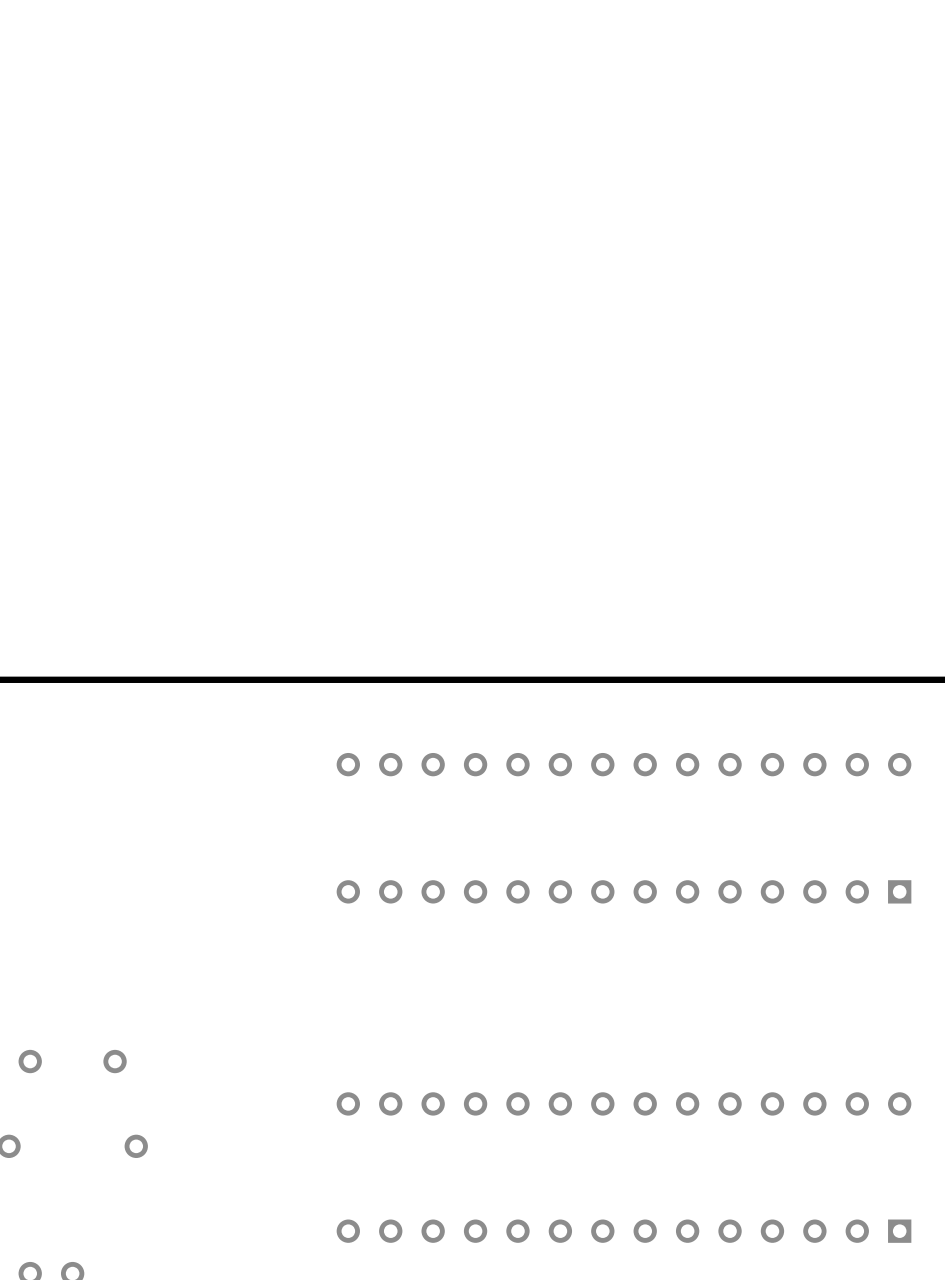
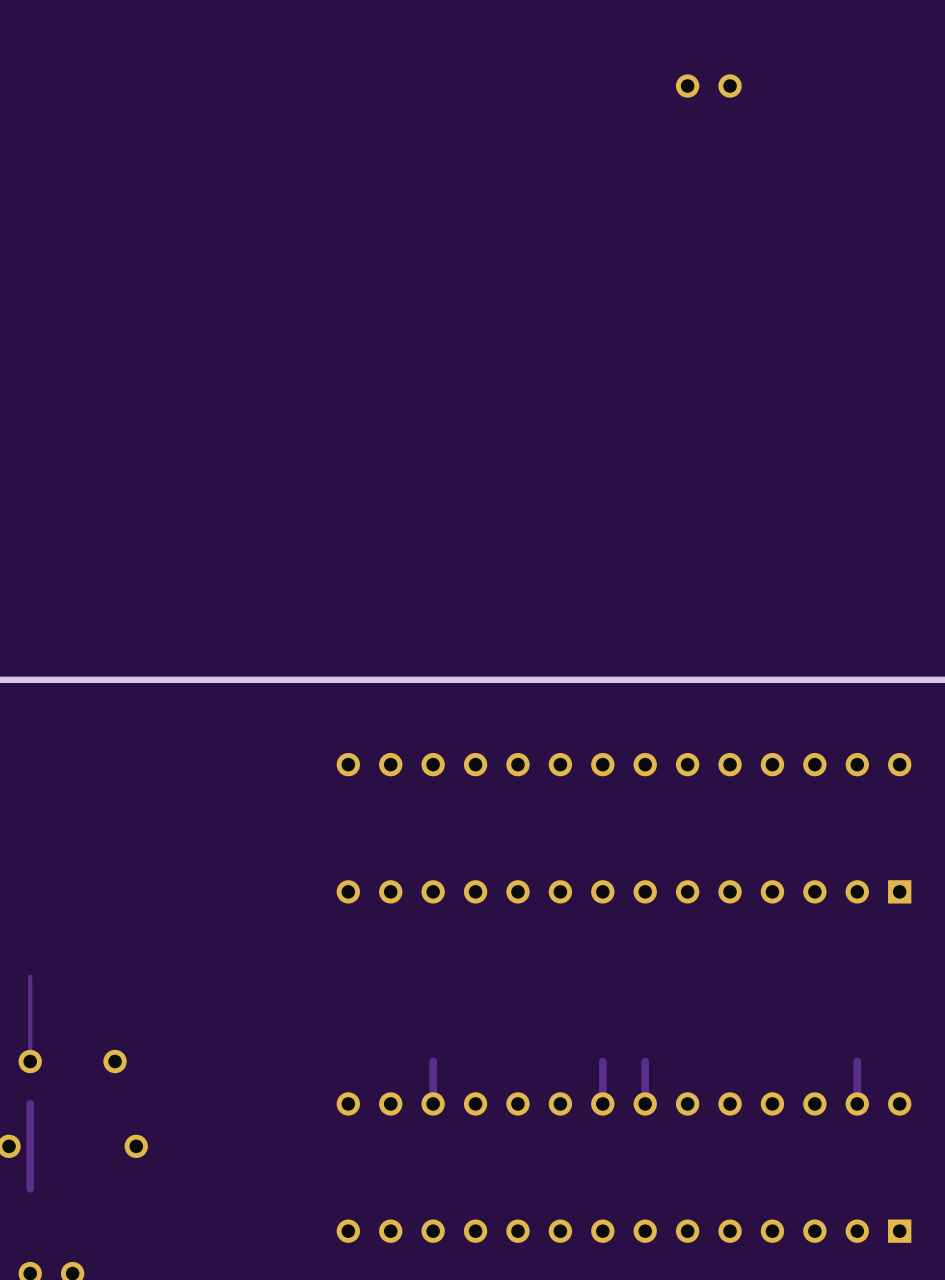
part: none -> (708, 86)
track: none -> (30, 976) (30, 1061)
track: none -> (433, 1061) (433, 1103)
track: none -> (602, 1061) (602, 1103)
track: none -> (645, 1061) (645, 1103)
track: none -> (857, 1061) (857, 1103)
track: none -> (30, 1103) (30, 1188)

